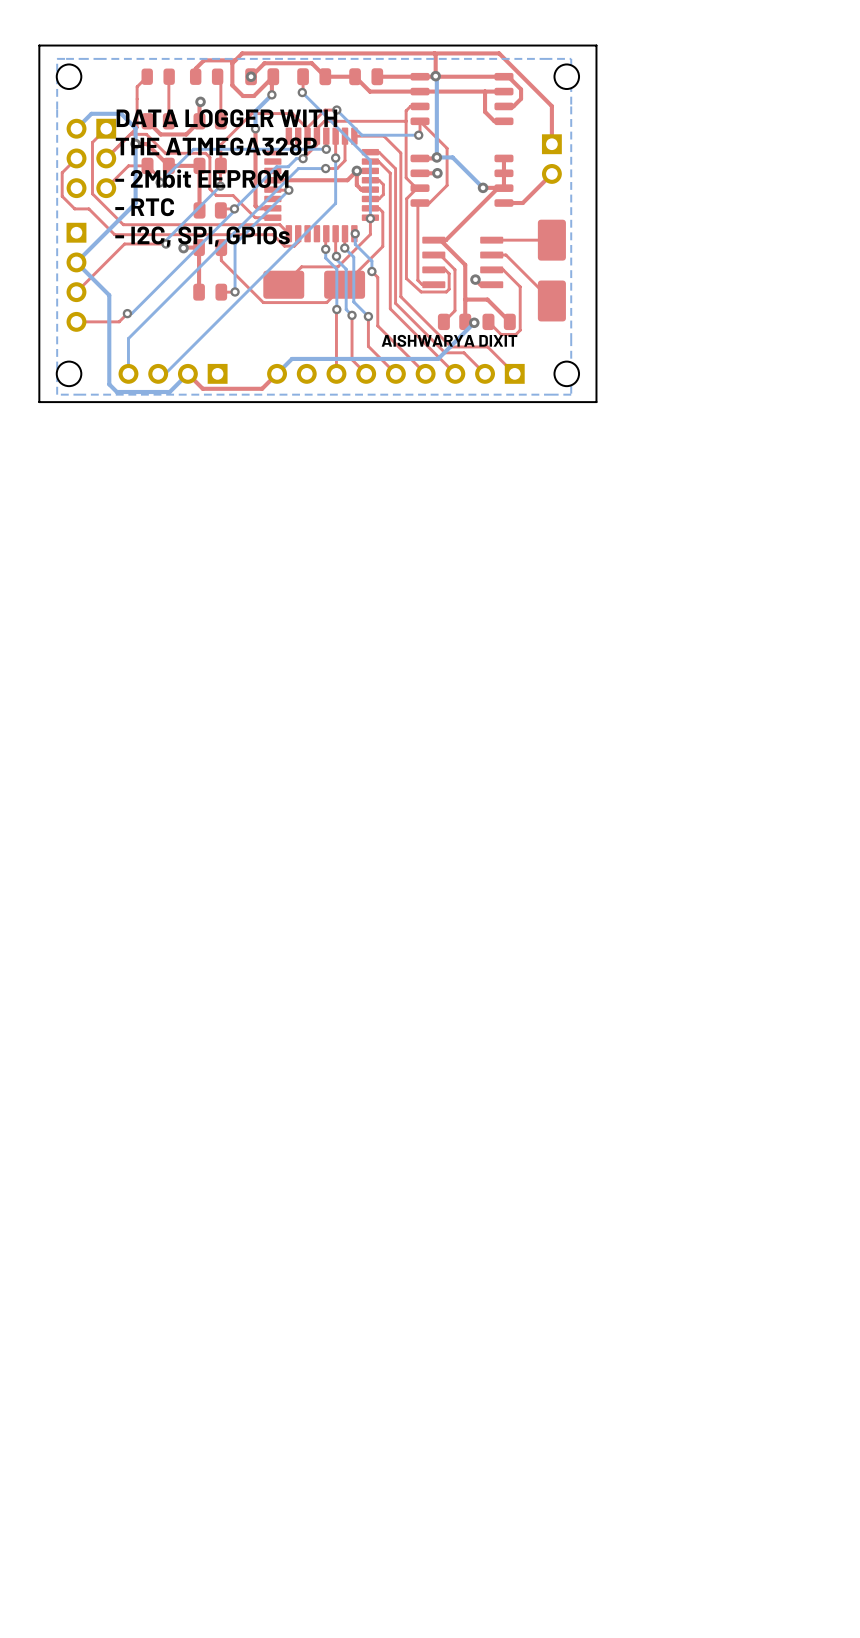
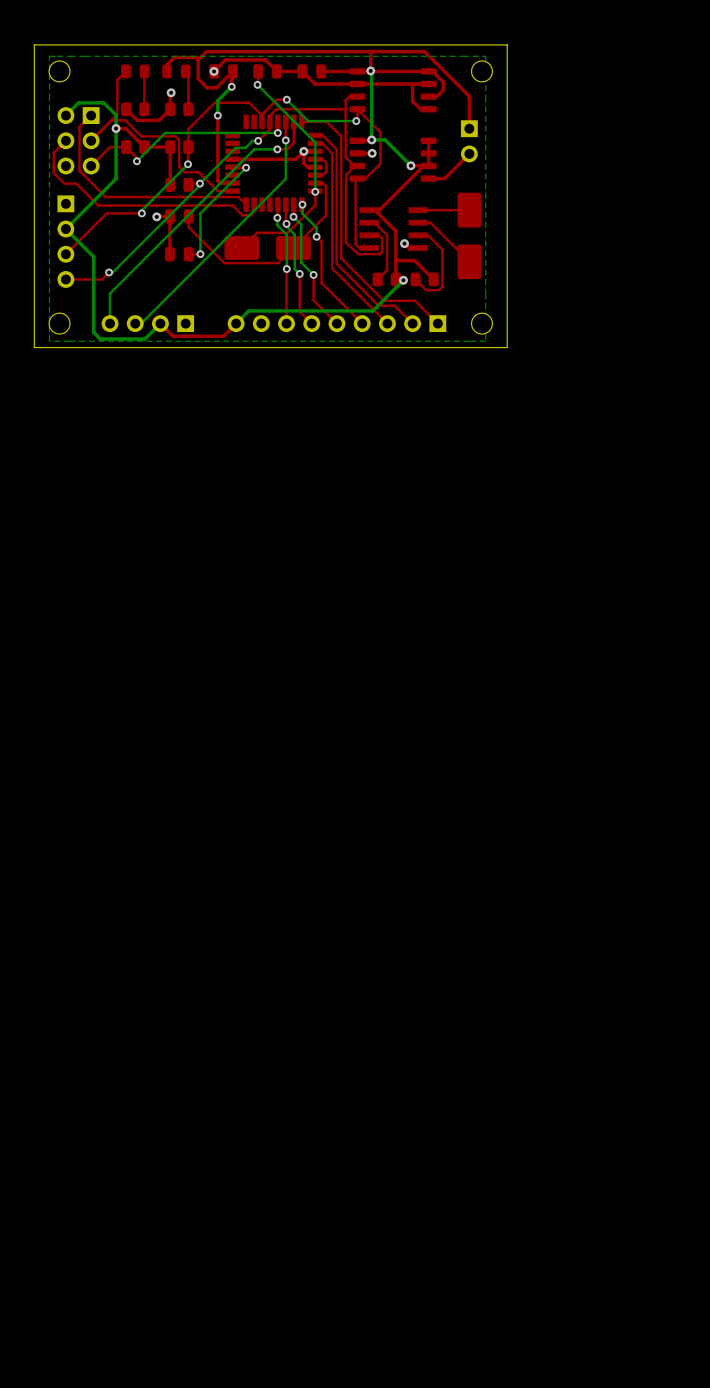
text: DATA LOGGER WITH (226, 118) -> none
text: THE ATMEGA328P (216, 146) -> none
text: - 2Mbit EEPROM (201, 178) -> none
text: - RTC (144, 207) -> none
text: - I2C, SPI, GPIOs (202, 236) -> none
text: AISHWARYA DIXIT (449, 340) -> none

